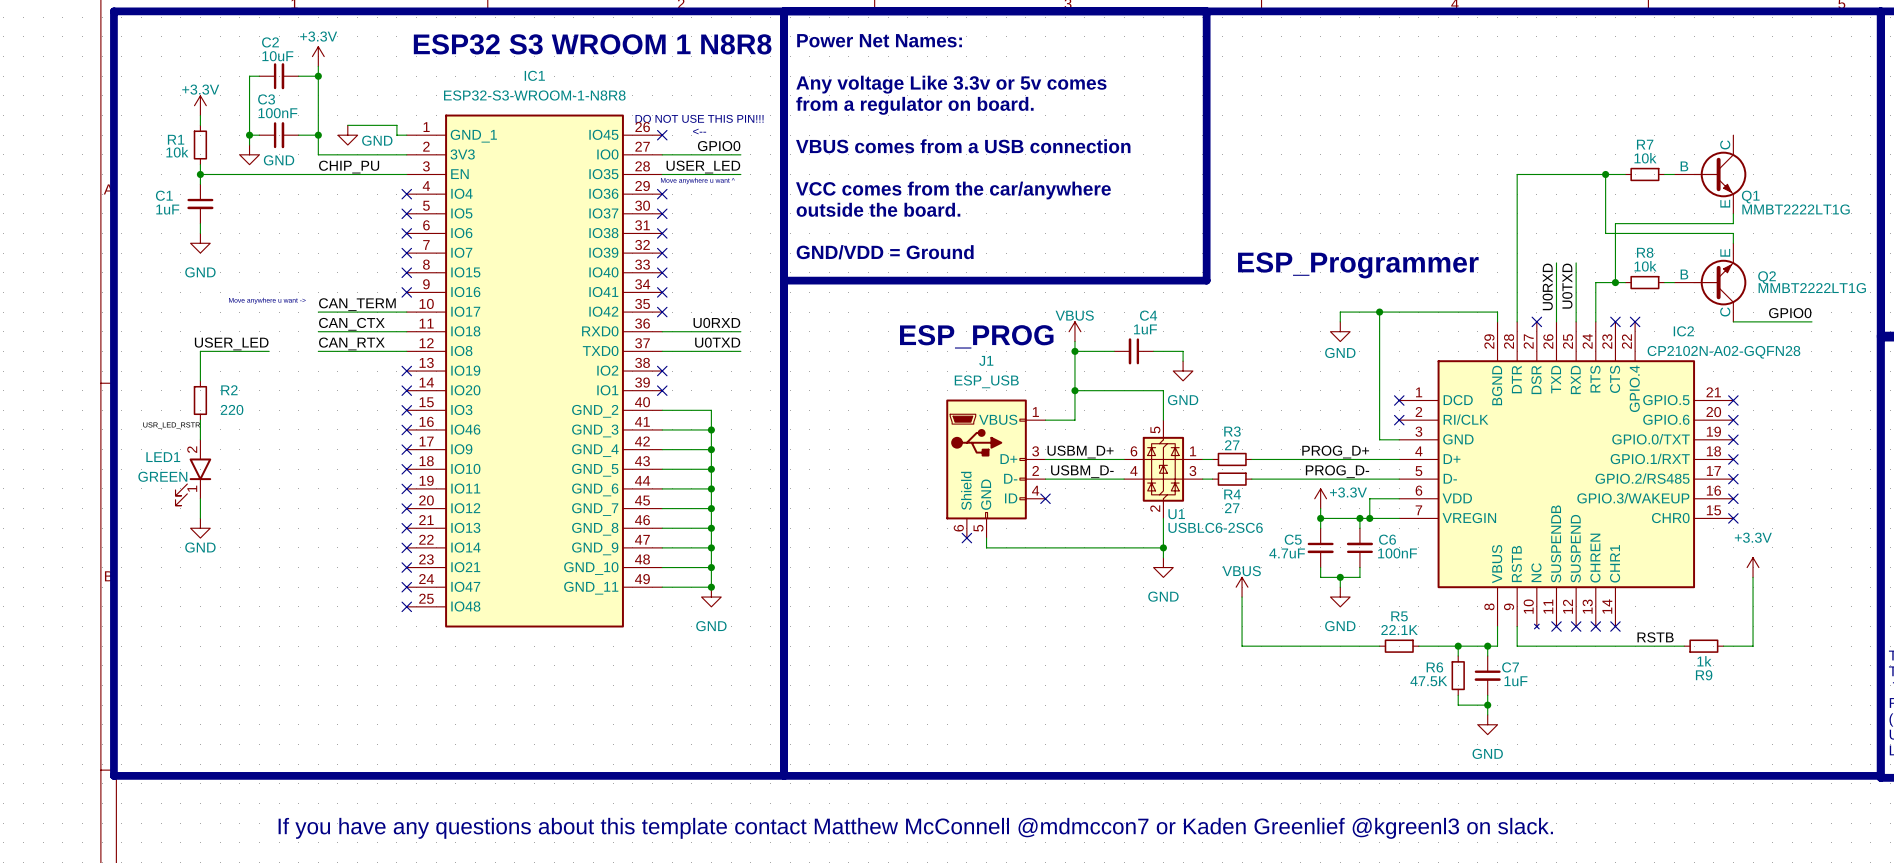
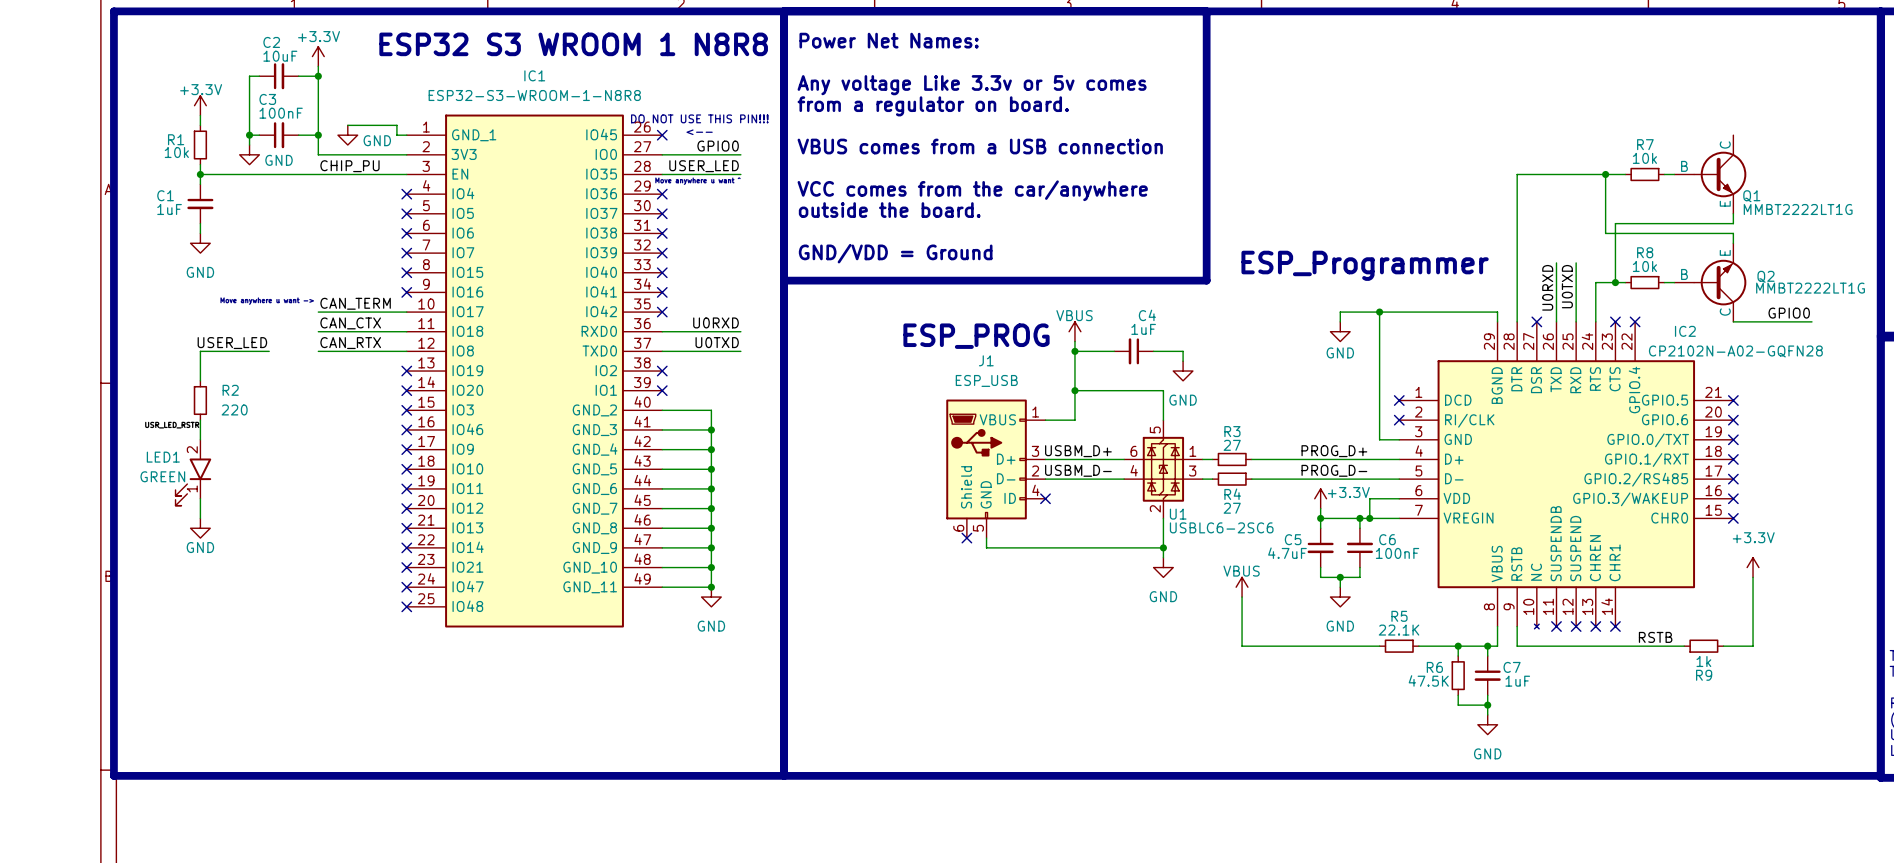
text: If you have any questions about this template contact Matthew McConnell @mdmccon7 or Kaden Greenlief @kgreenl3 on slack. (915, 828) -> none

